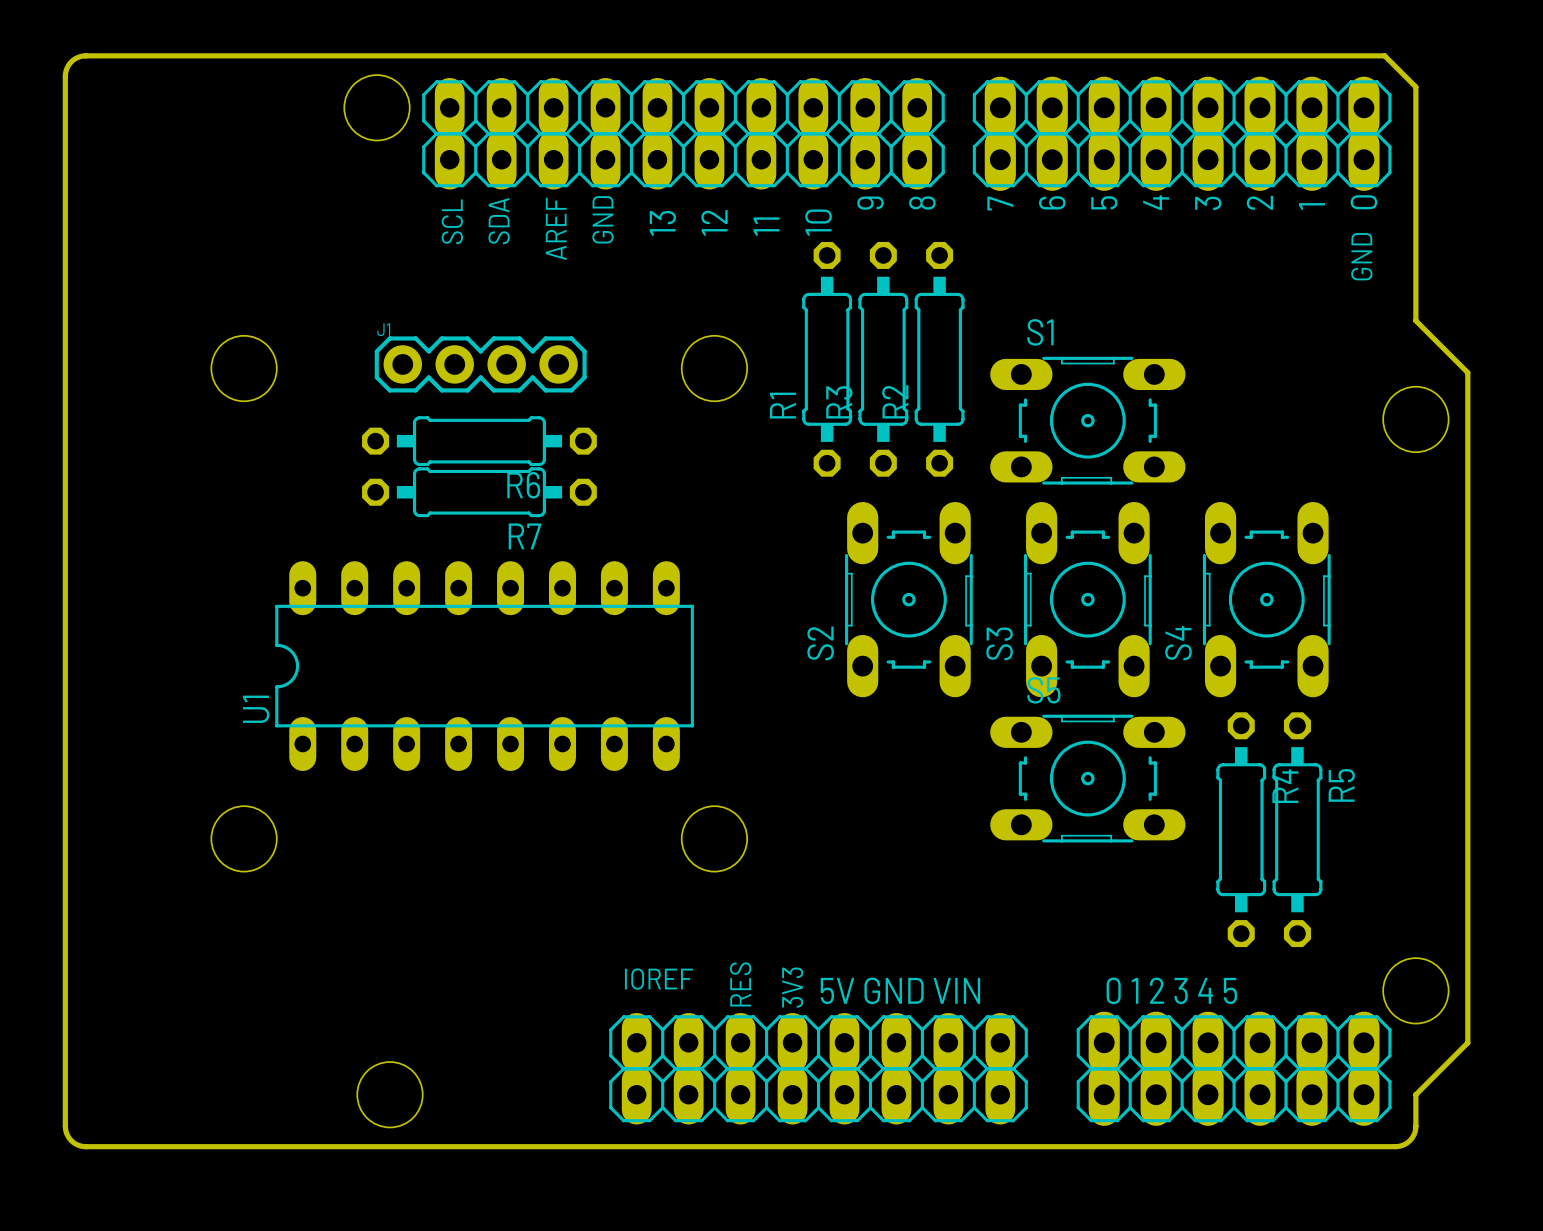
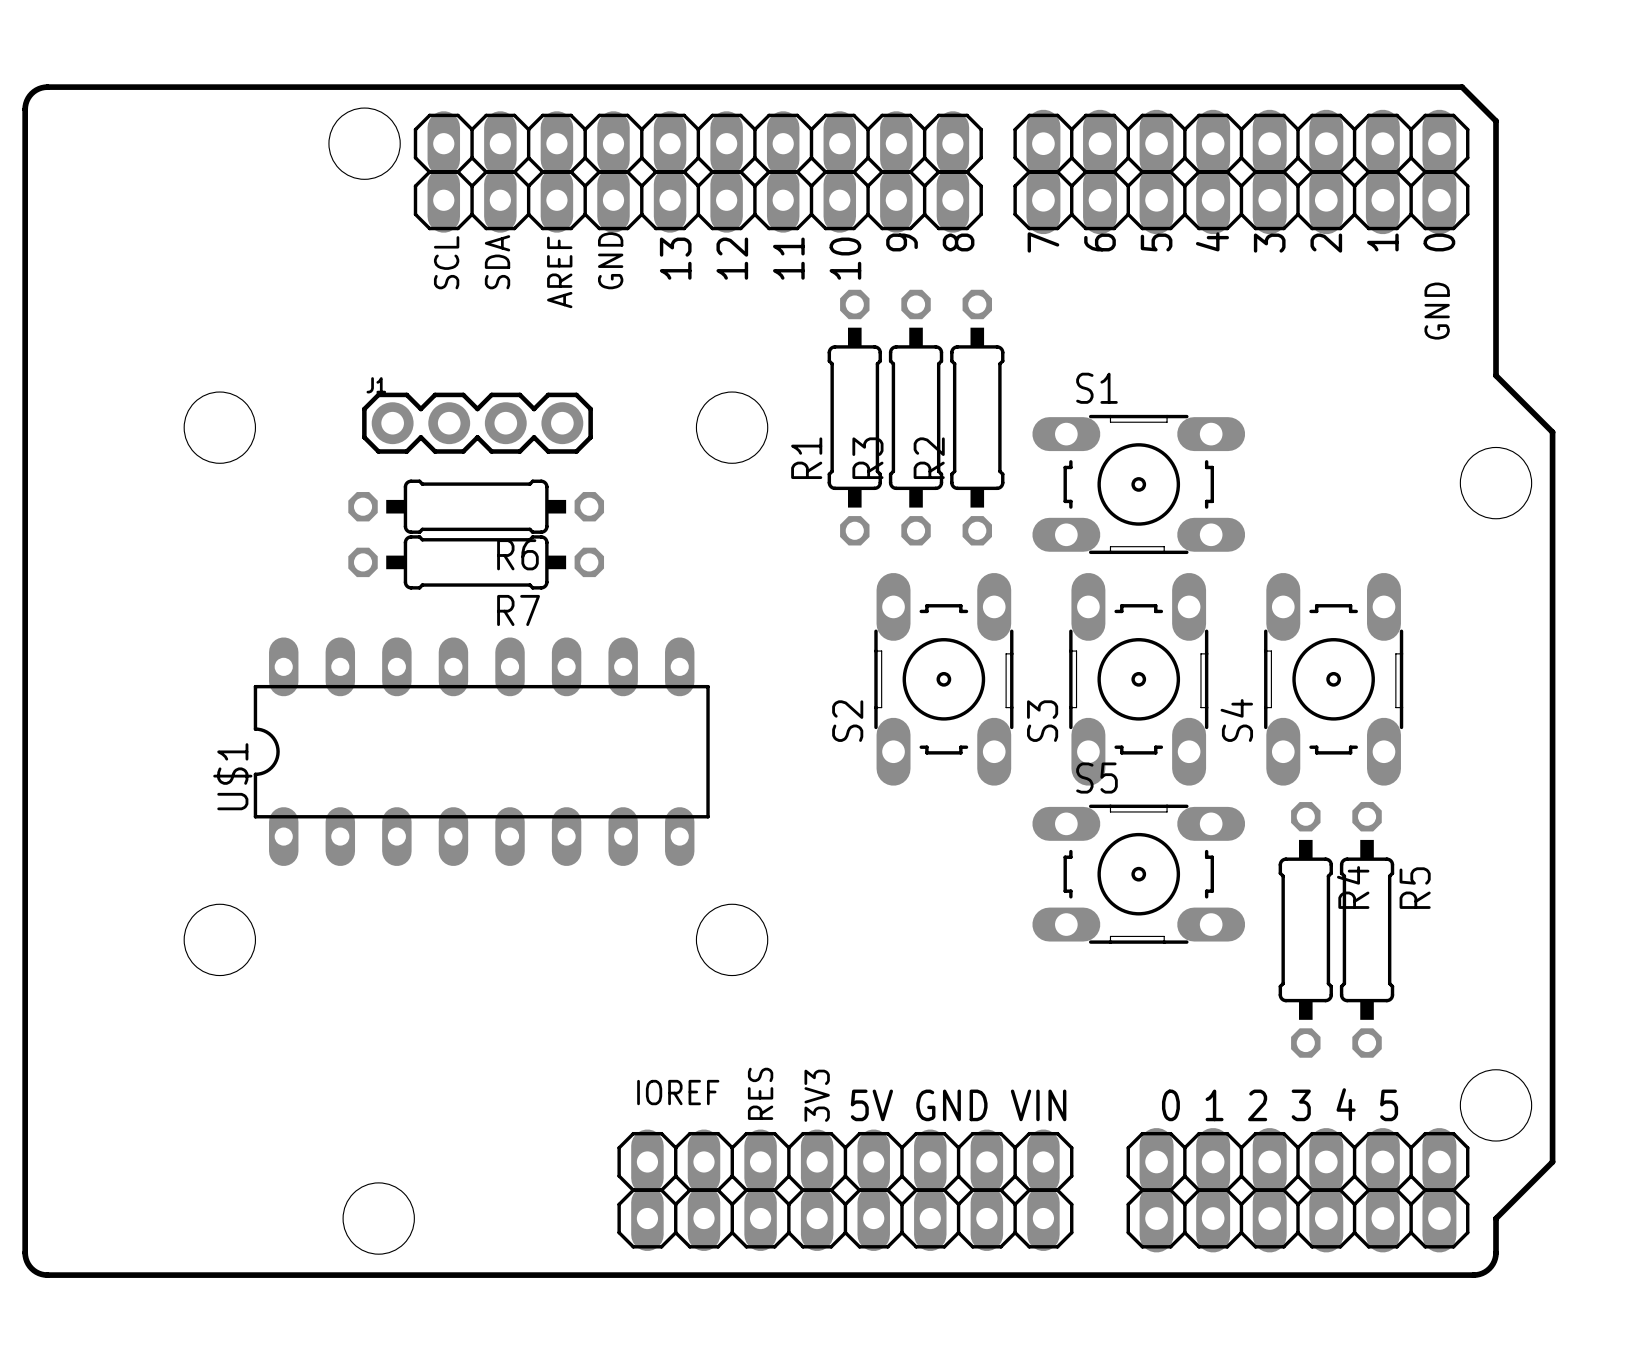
U1 name: U1 (256, 709) -> U$1 (232, 776)

